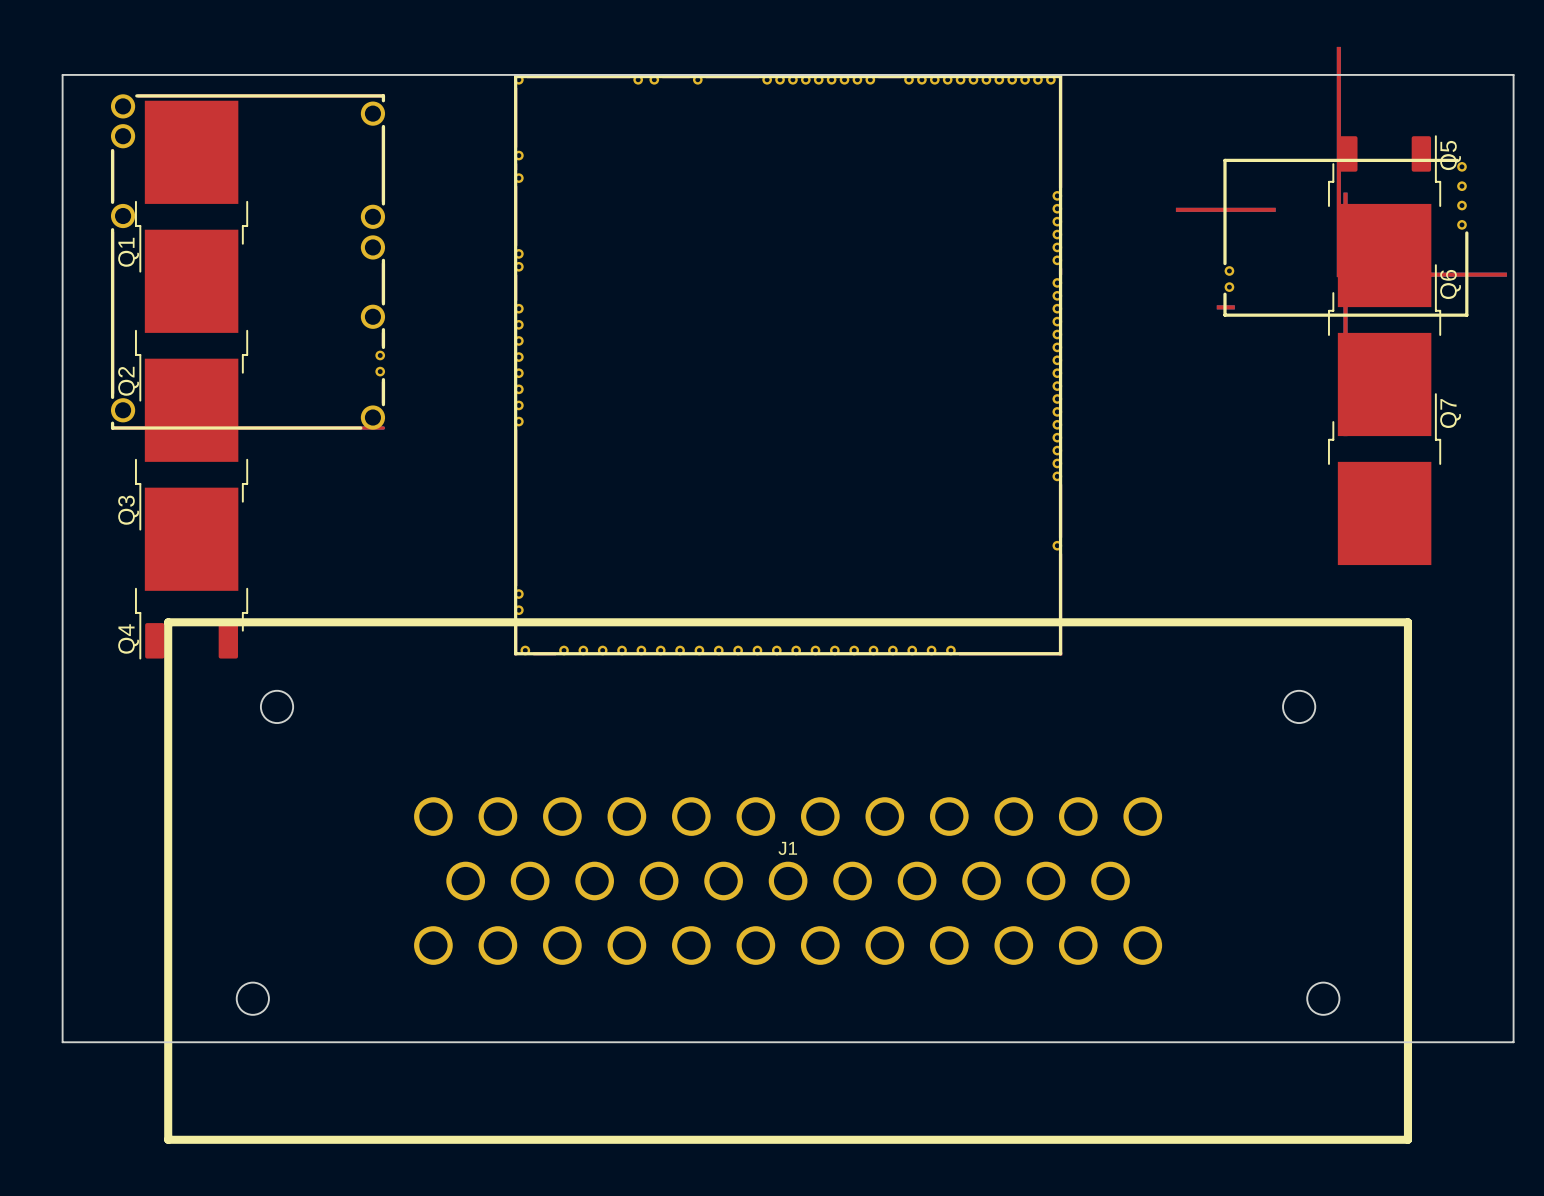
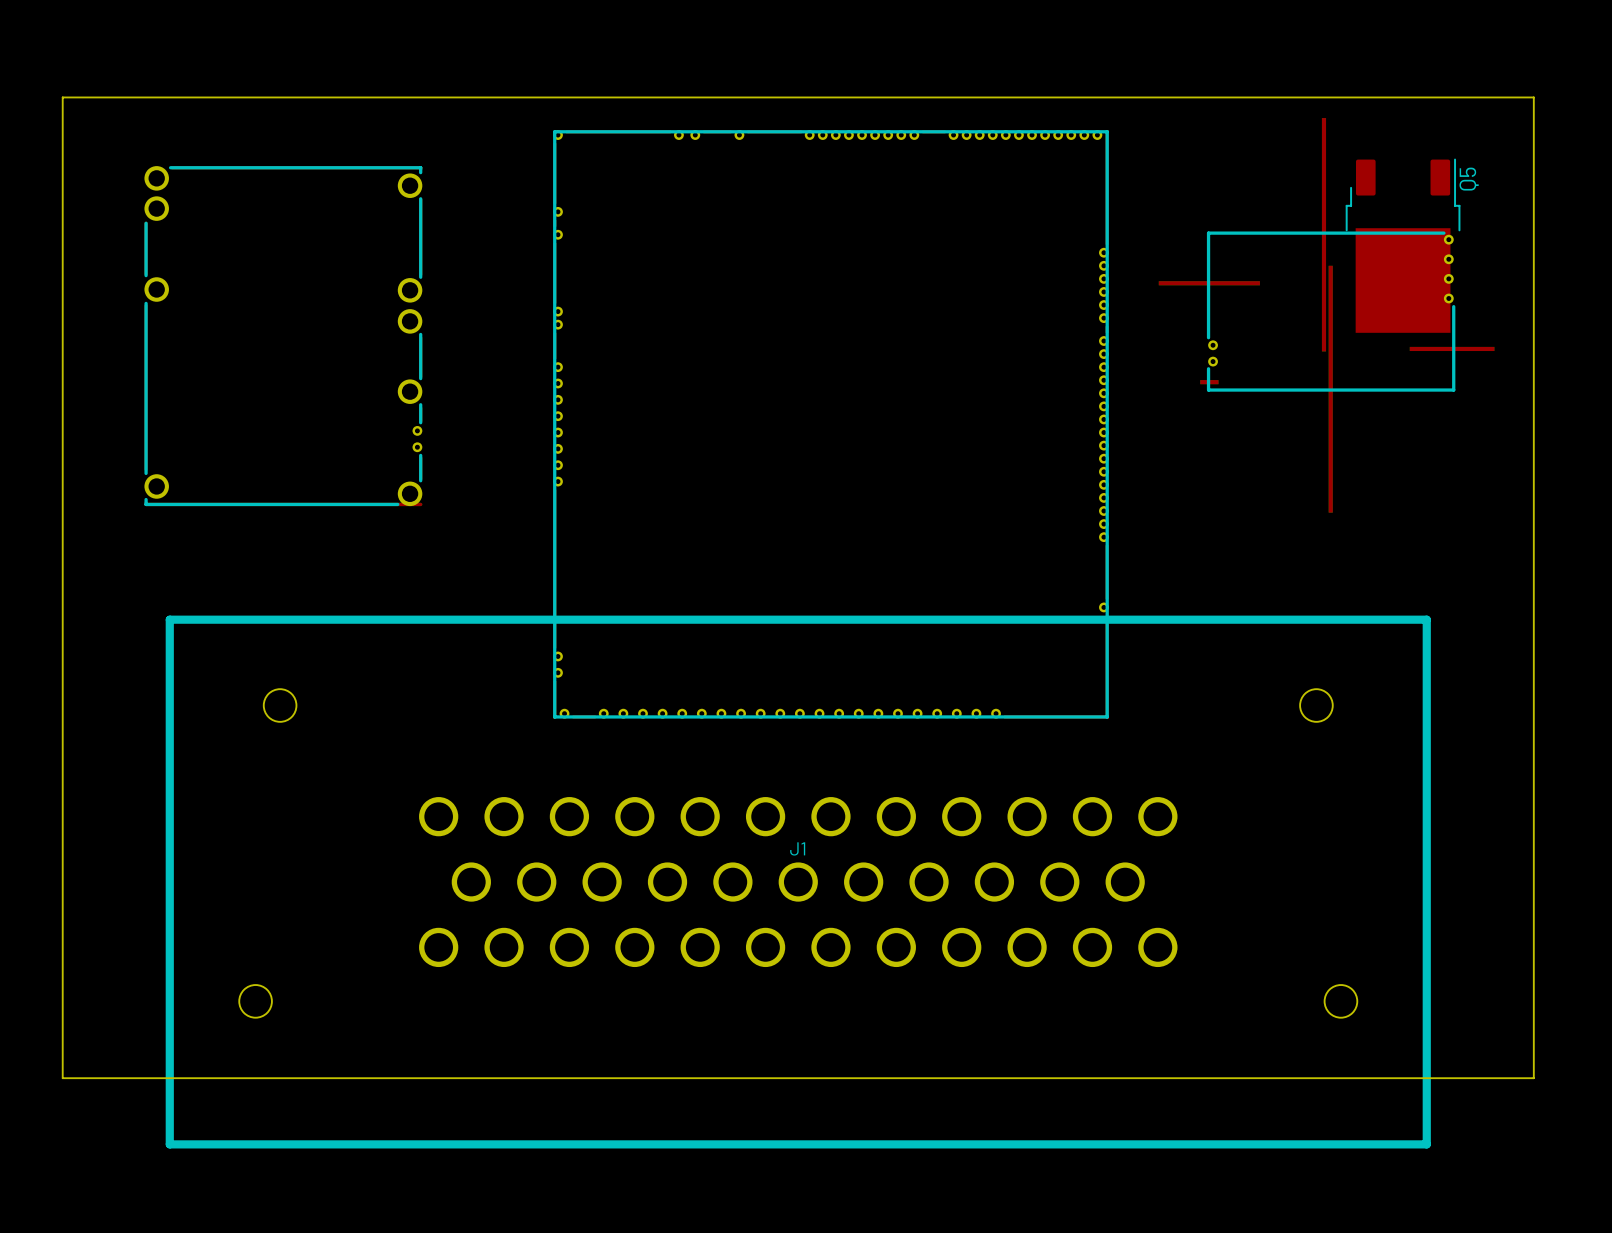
Q1: (191, 186) -> none
part position: (1341, 241) -> (1326, 315)
part position: (248, 261) -> (283, 336)
Q2: (191, 315) -> none
Q6: (1384, 350) -> none
part position: (788, 365) -> (830, 424)
Q3: (191, 444) -> none
Q7: (1384, 479) -> none
Q4: (191, 573) -> none
J1 position: (788, 881) -> (798, 882)

